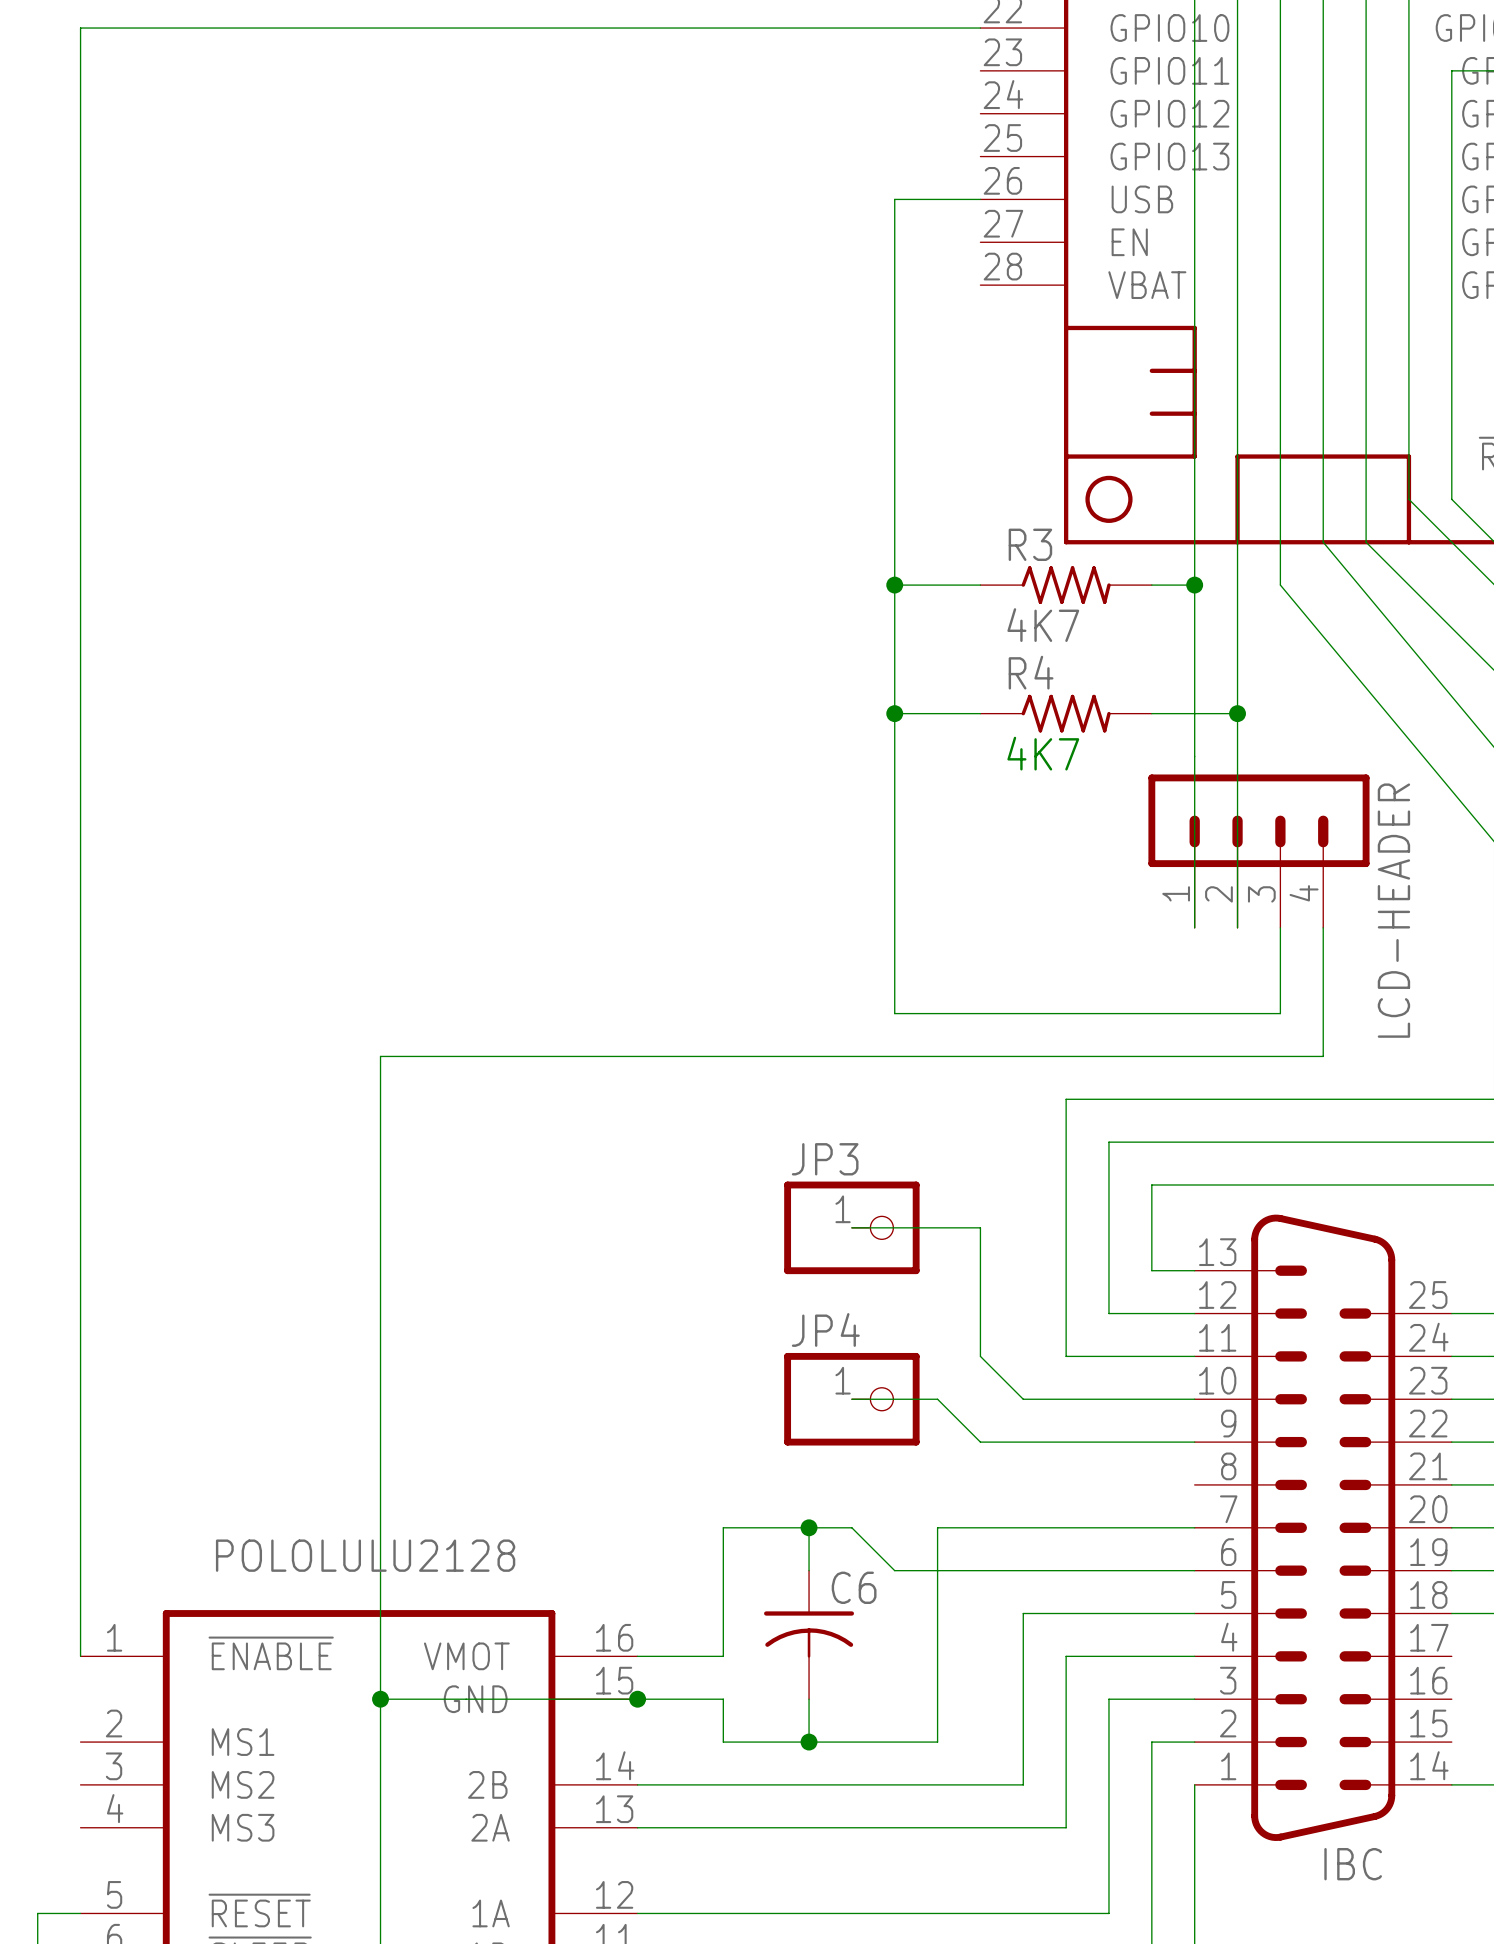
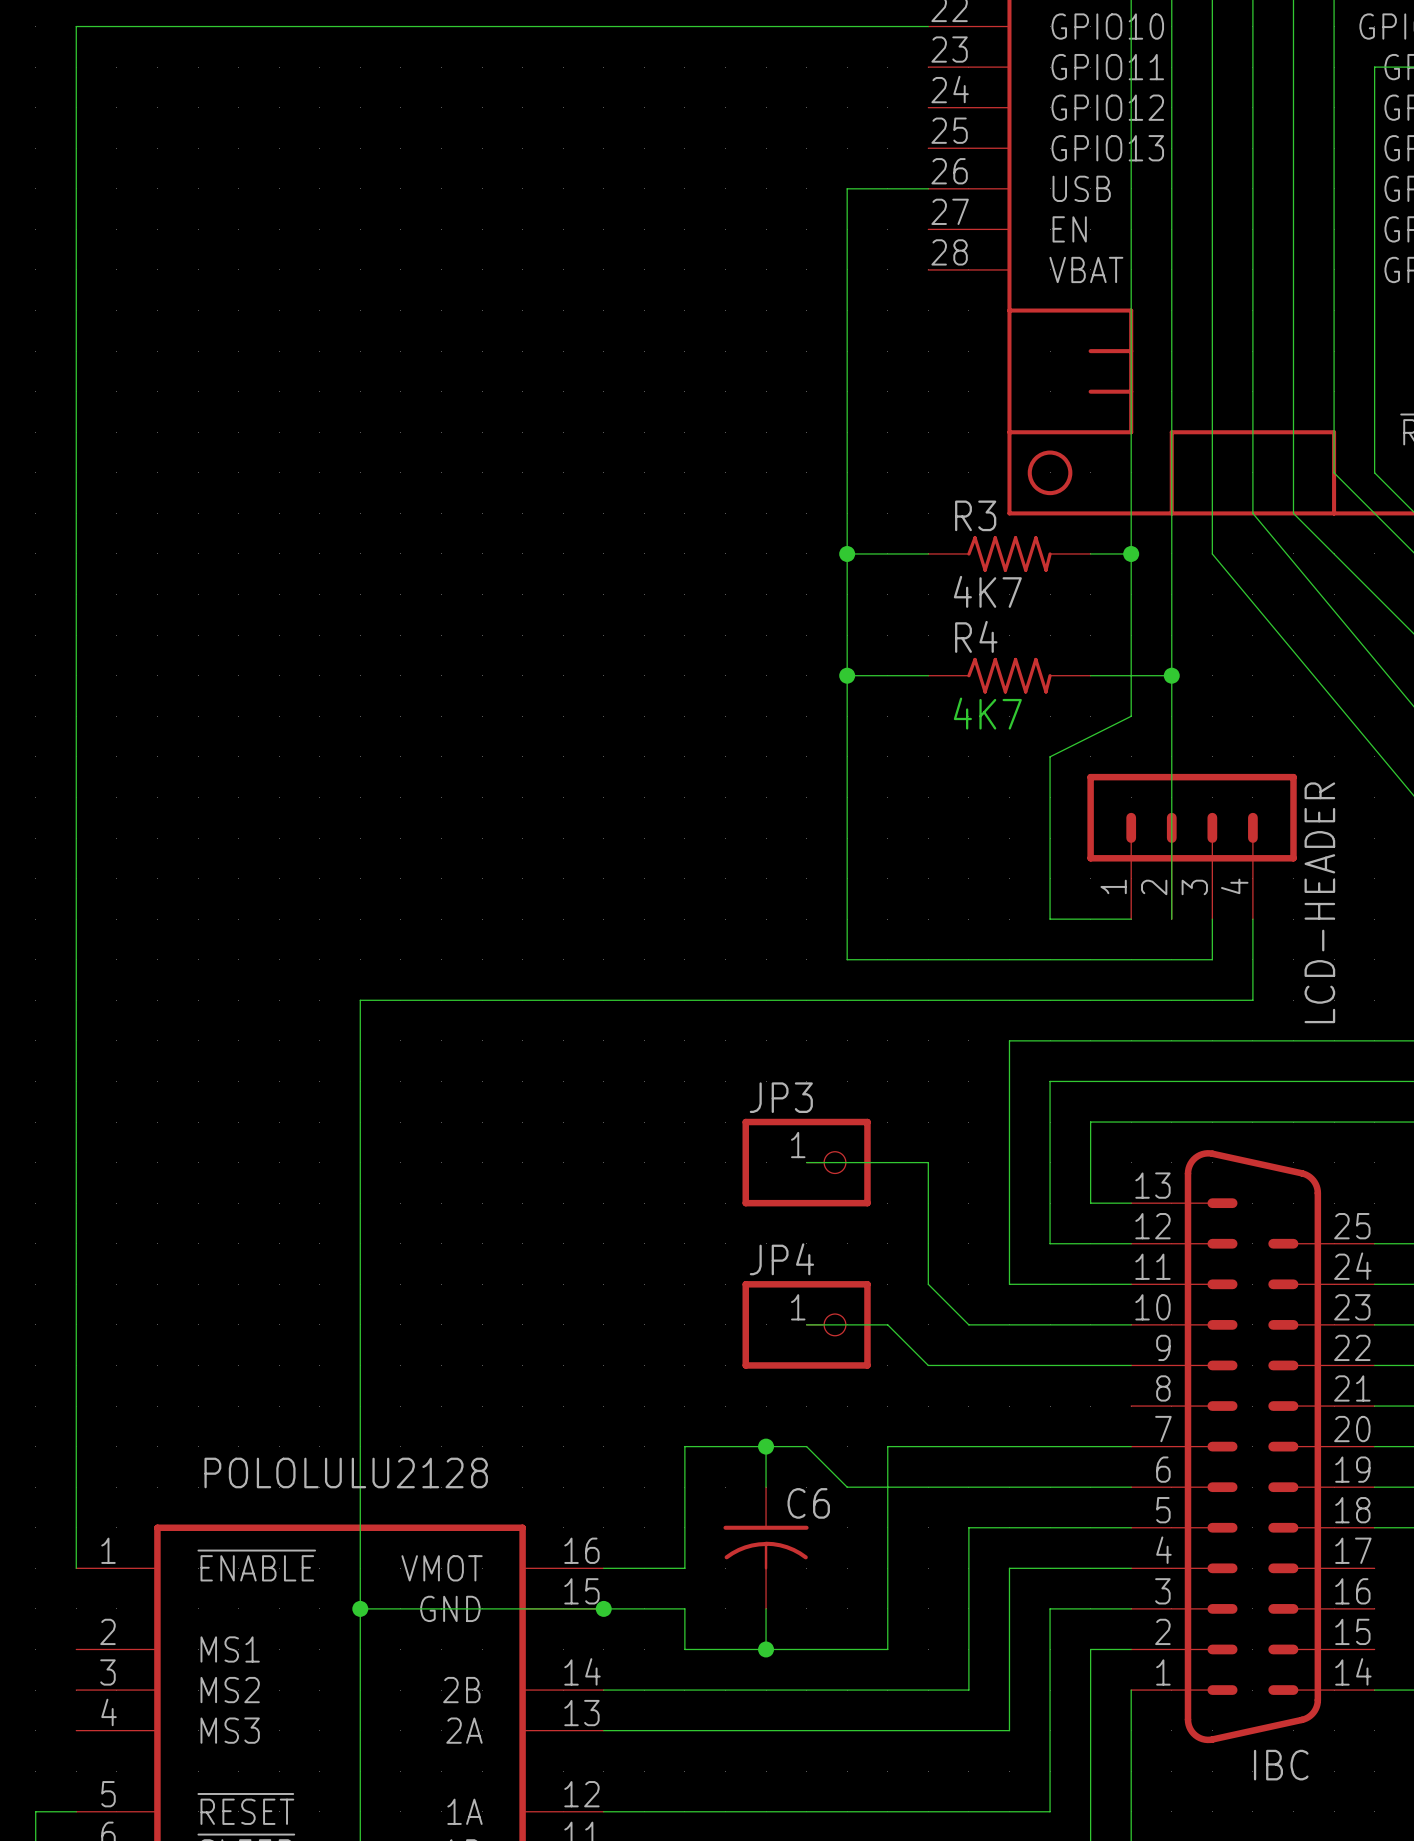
wire: (1194, 756) (1194, 927) -> (1131, 716) (1050, 756) (1050, 919) (1131, 919)
LCD-HEADER position: (1258, 851) -> (1192, 846)

